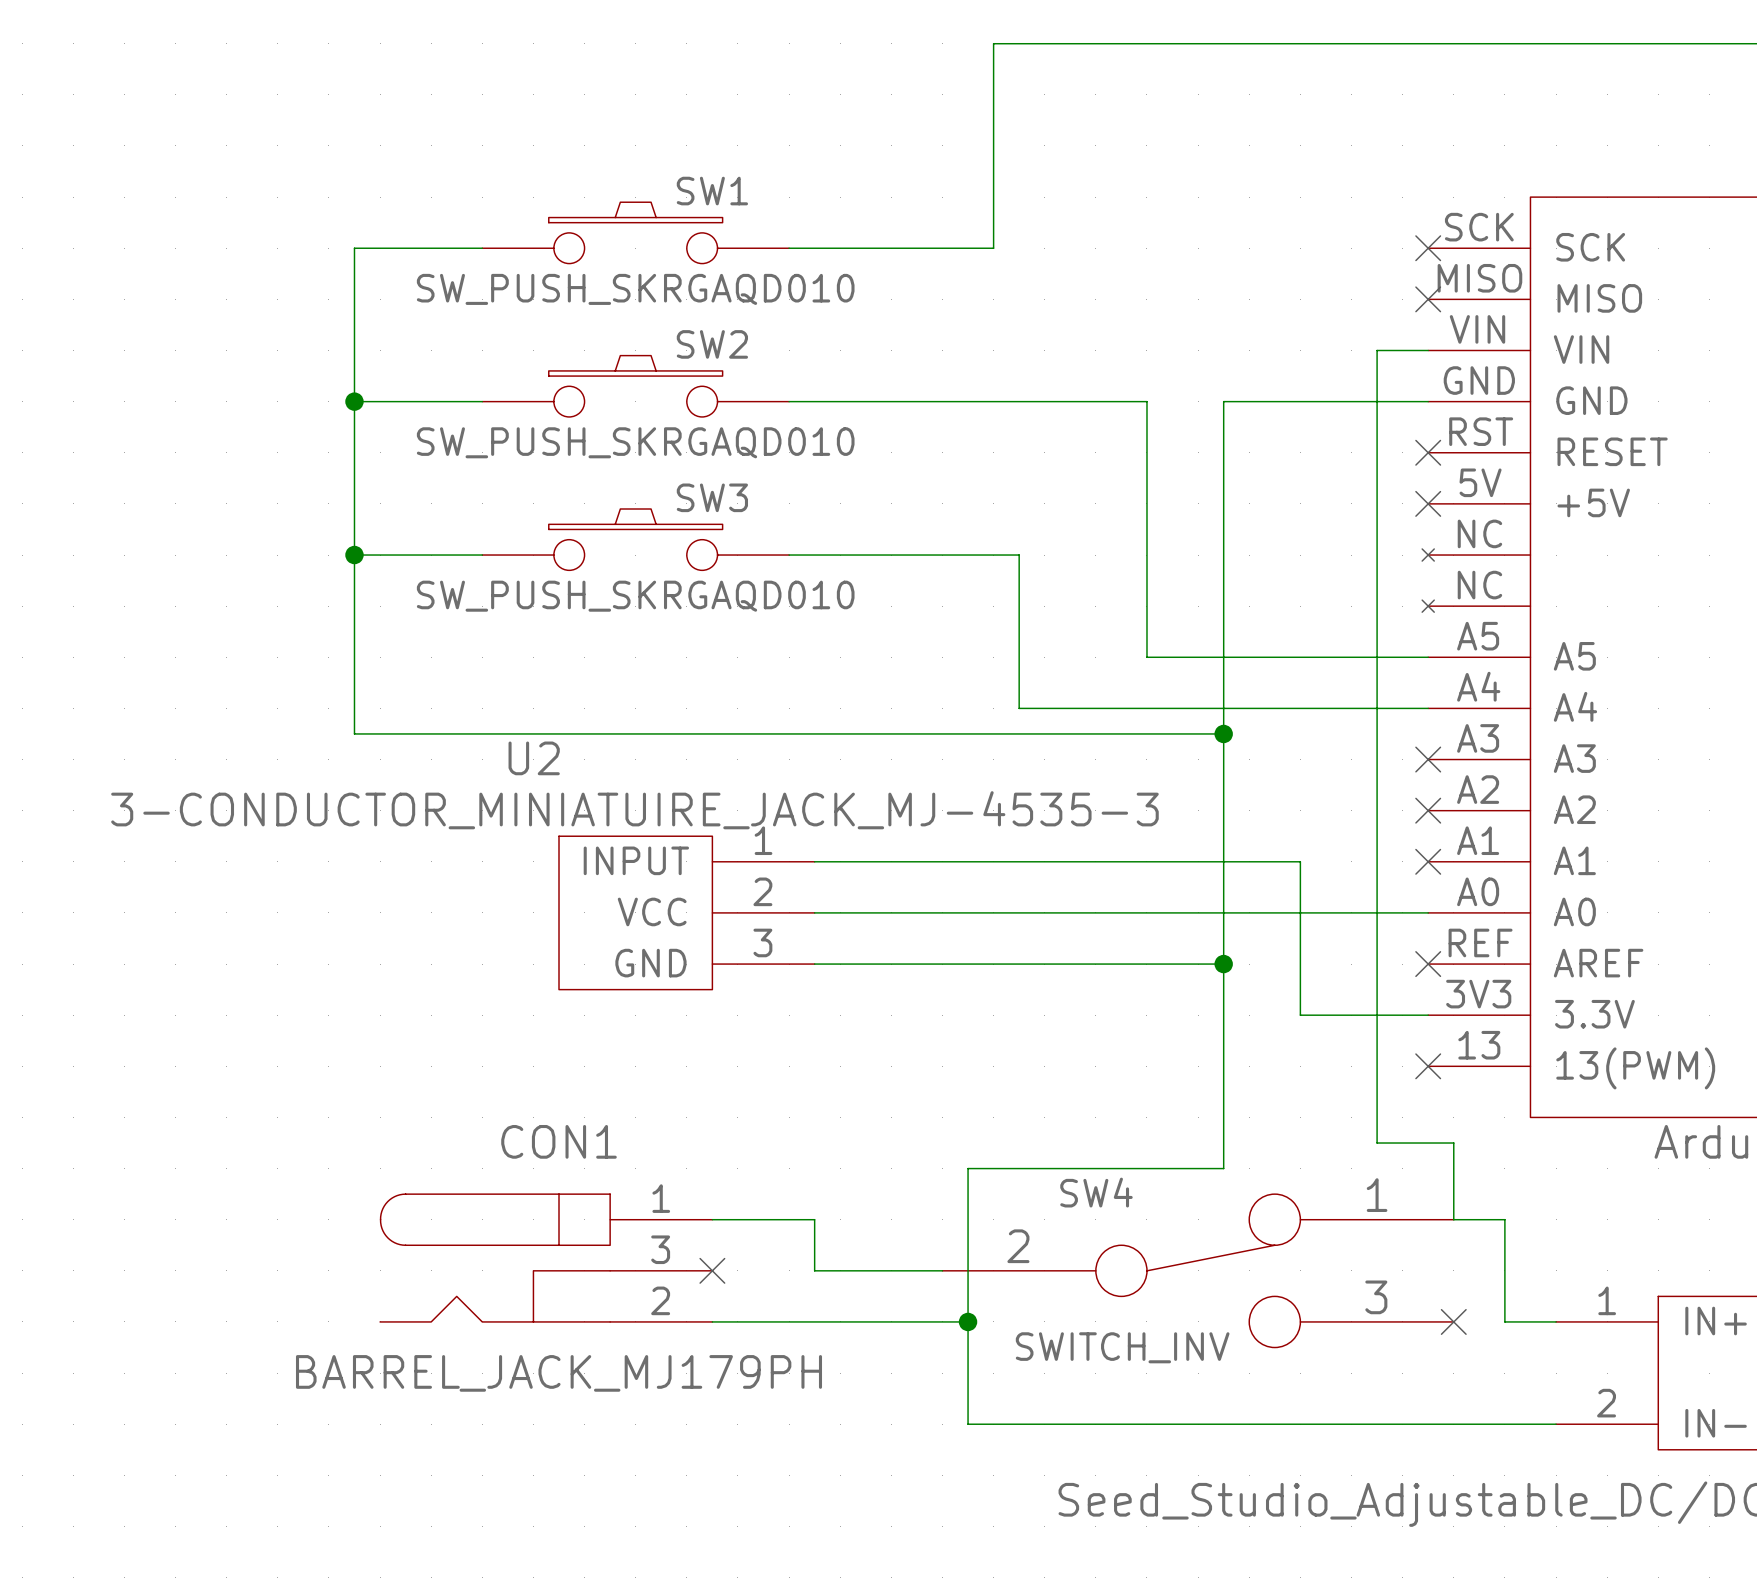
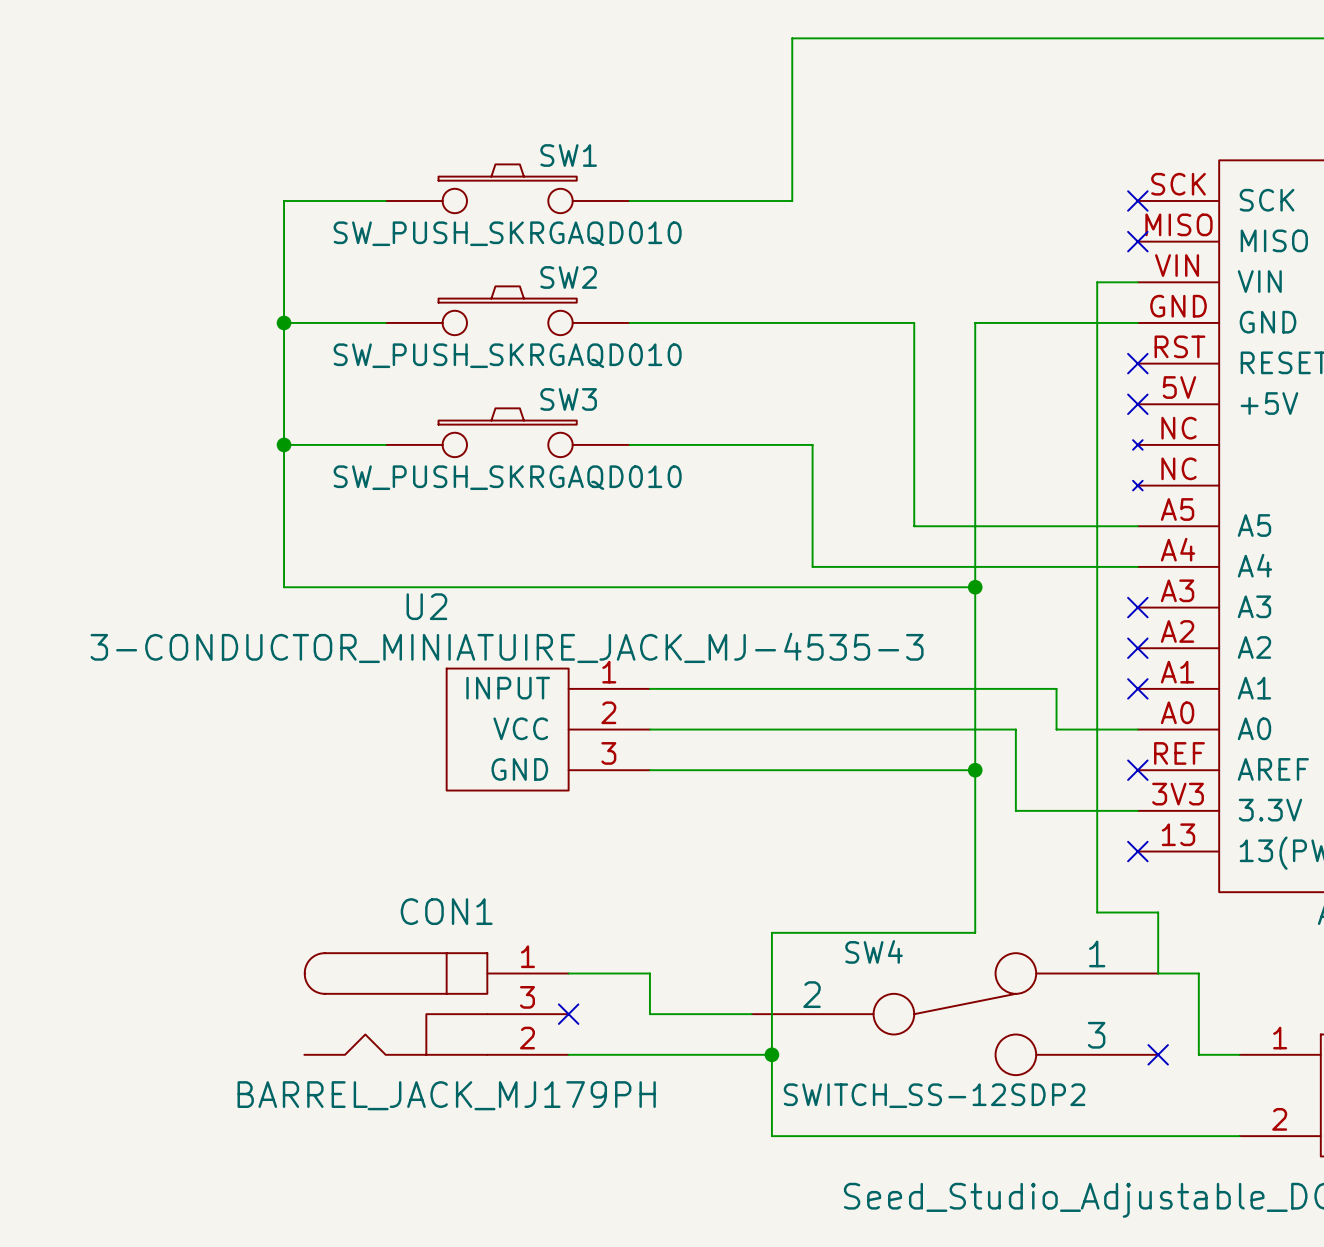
wire: (1300, 861) (1300, 1015) -> (1015, 729) (1015, 810) (1036, 810)
wire: (1274, 912) (1325, 912) -> (1036, 688) (1056, 688) (1056, 729)
SW4 value: SWITCH_INV (1122, 1347) -> SWITCH_SS-12SDP2 (934, 1095)

